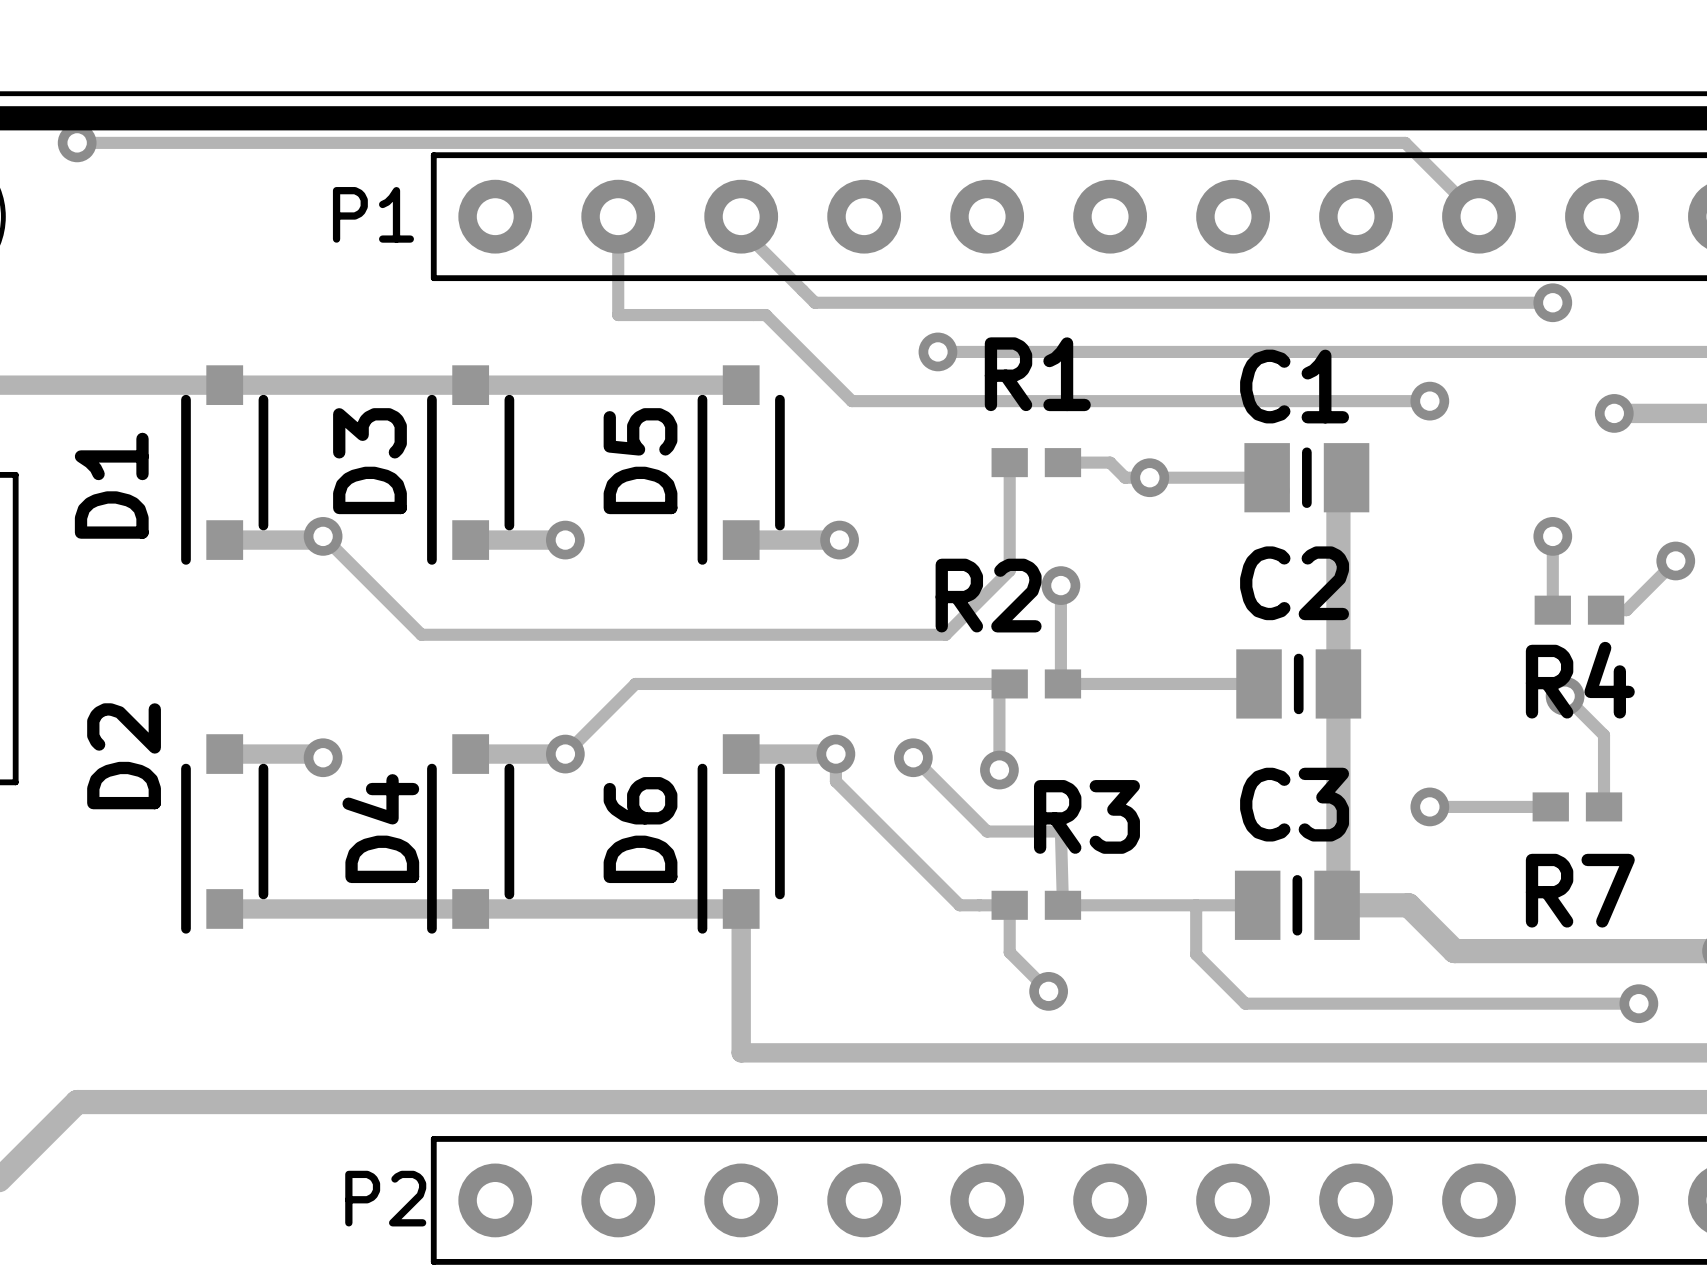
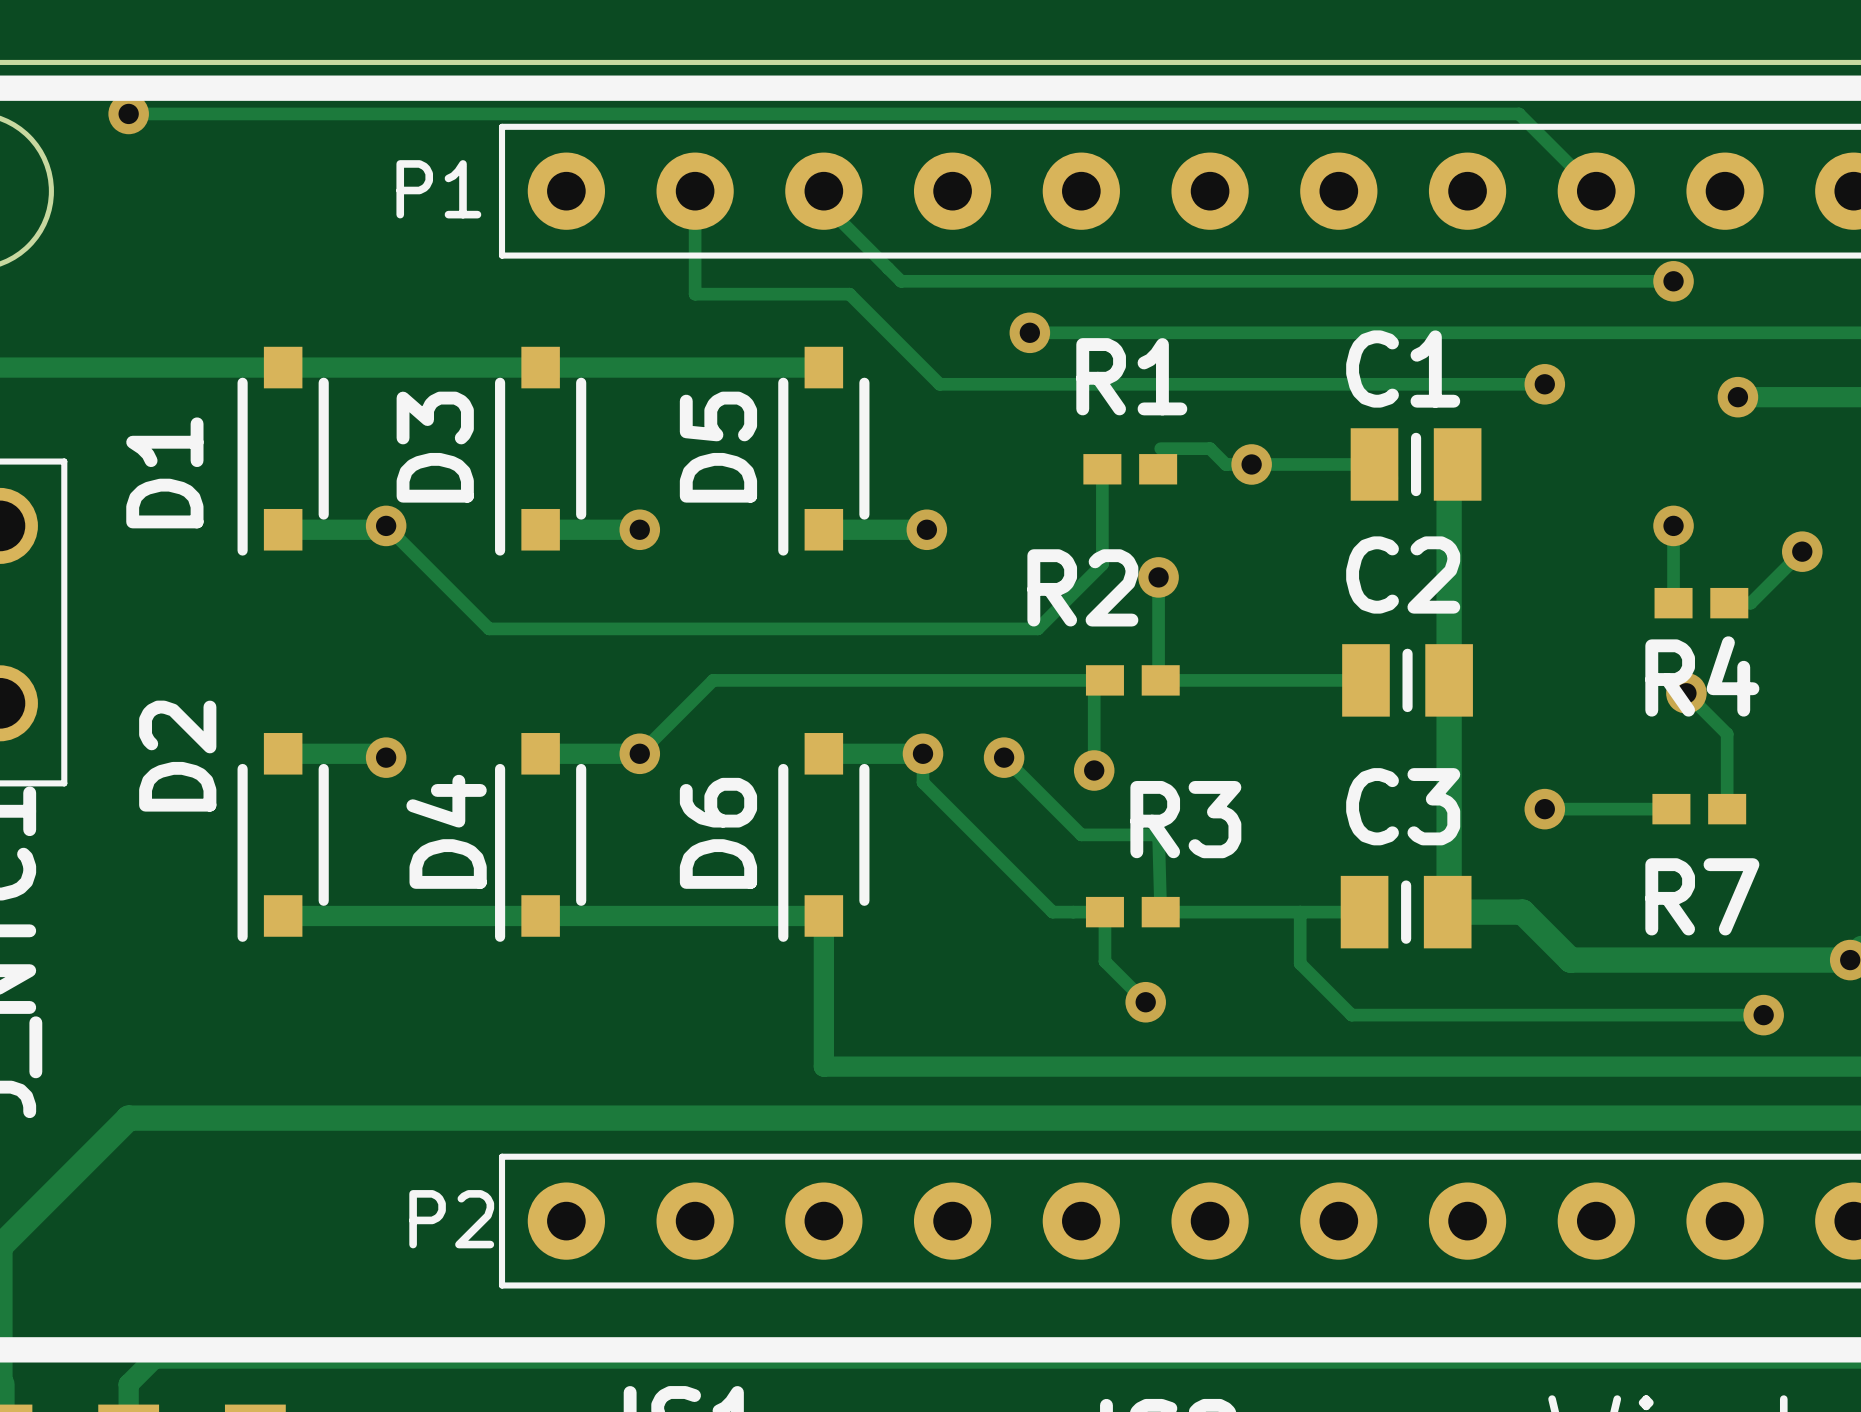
track: (1009, 462) (1009, 570) (1007, 573) -> (1102, 469) (1102, 564)
R1 position: (1036, 462) -> (1130, 469)

